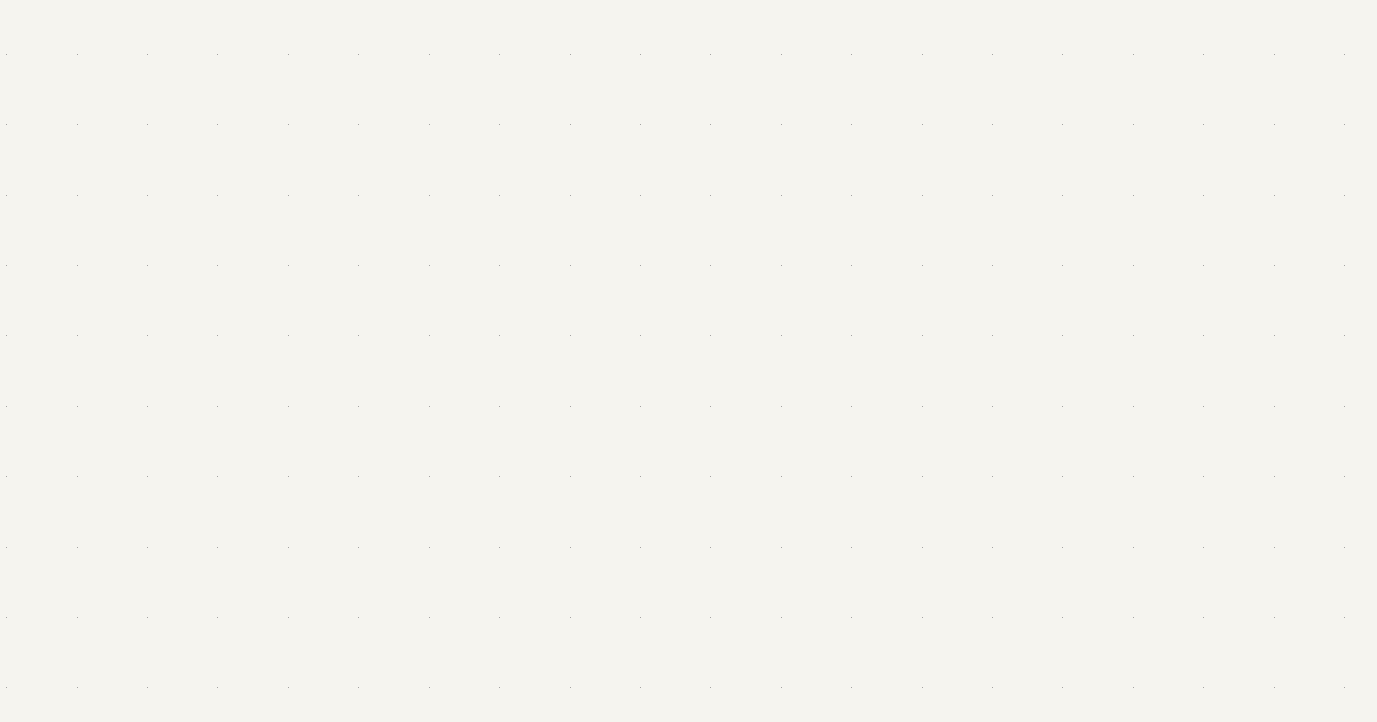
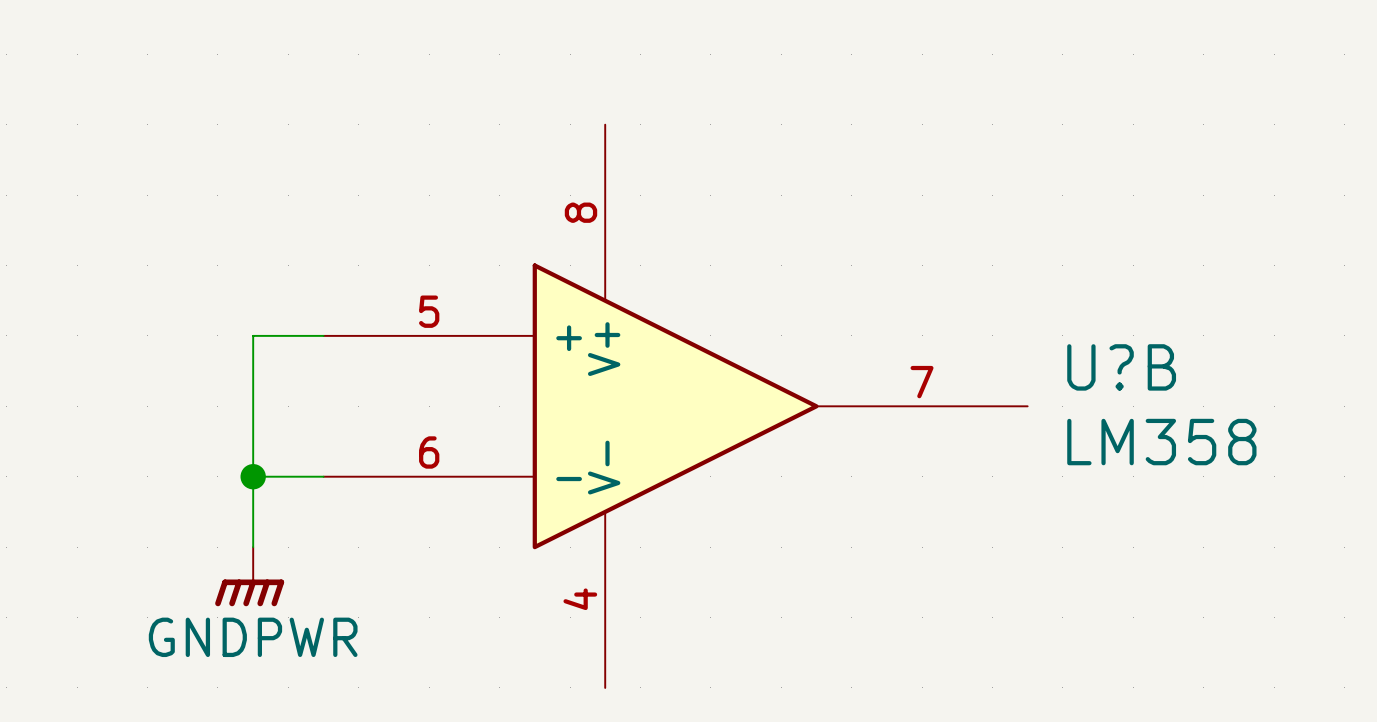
wire: none -> (323, 335) (253, 335) (253, 547)
U?B: none -> LM358 (675, 406)
wire: none -> (253, 476) (323, 476)
junction: none -> (253, 476)
power symbol: none -> GNDPWR (249, 576)

